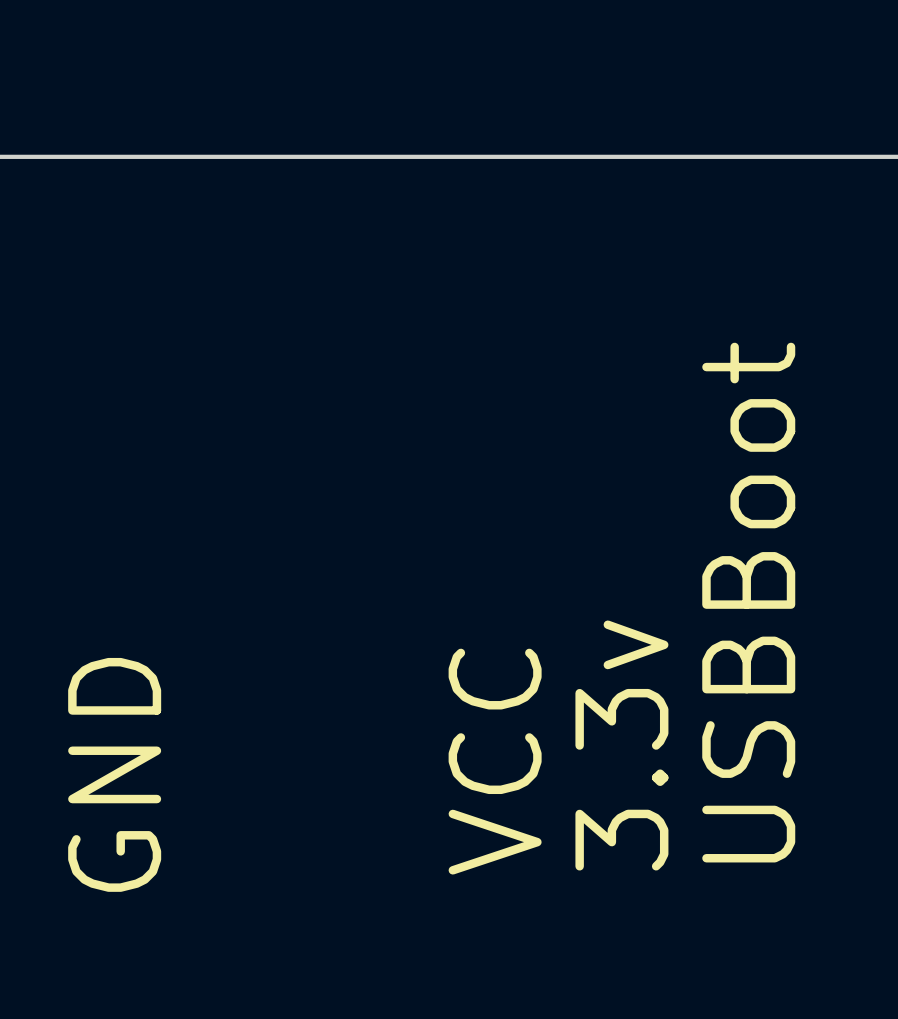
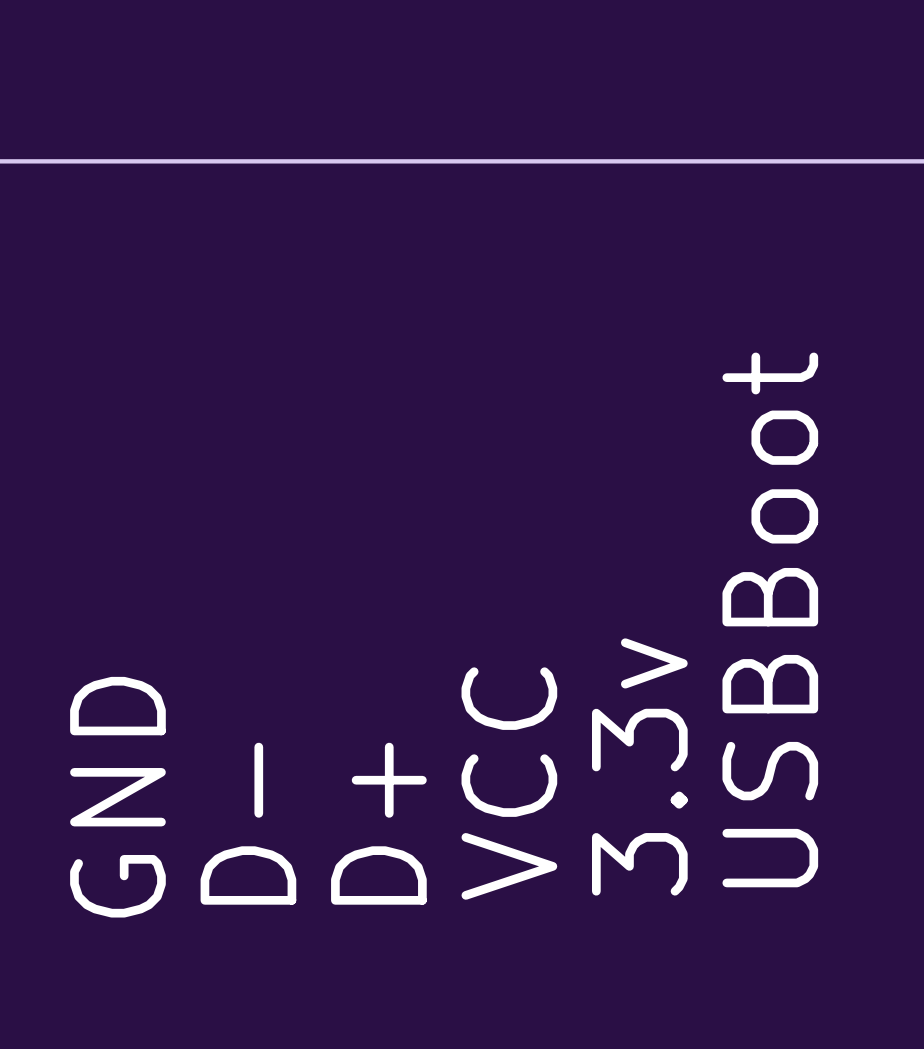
text: none -> D- (248, 823)
text: none -> D+ (378, 823)

